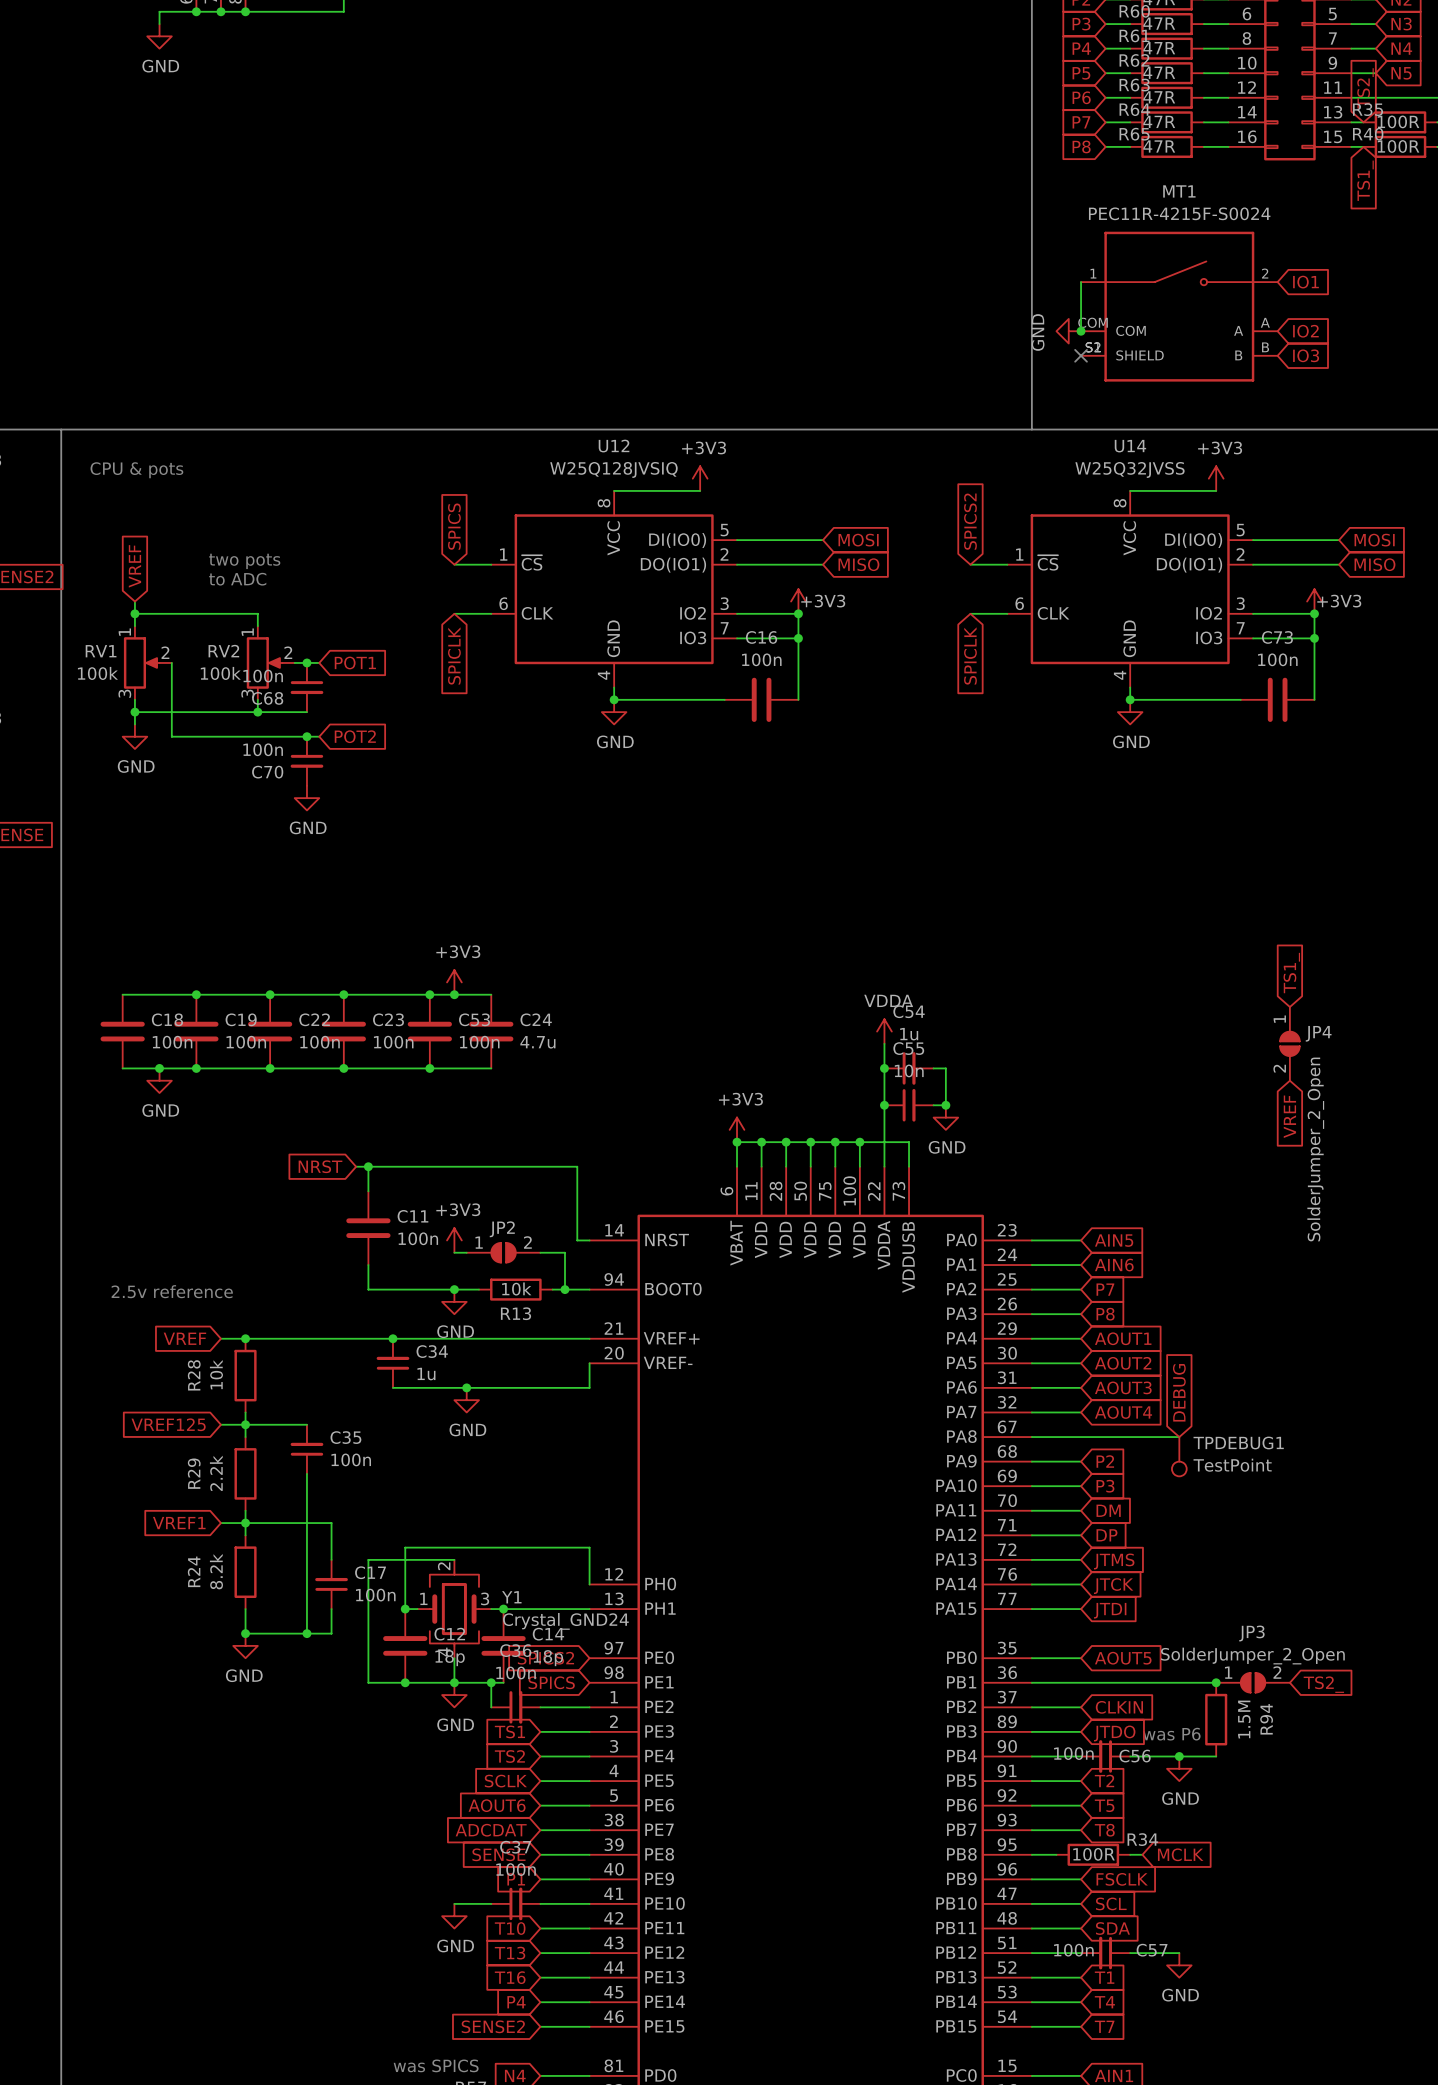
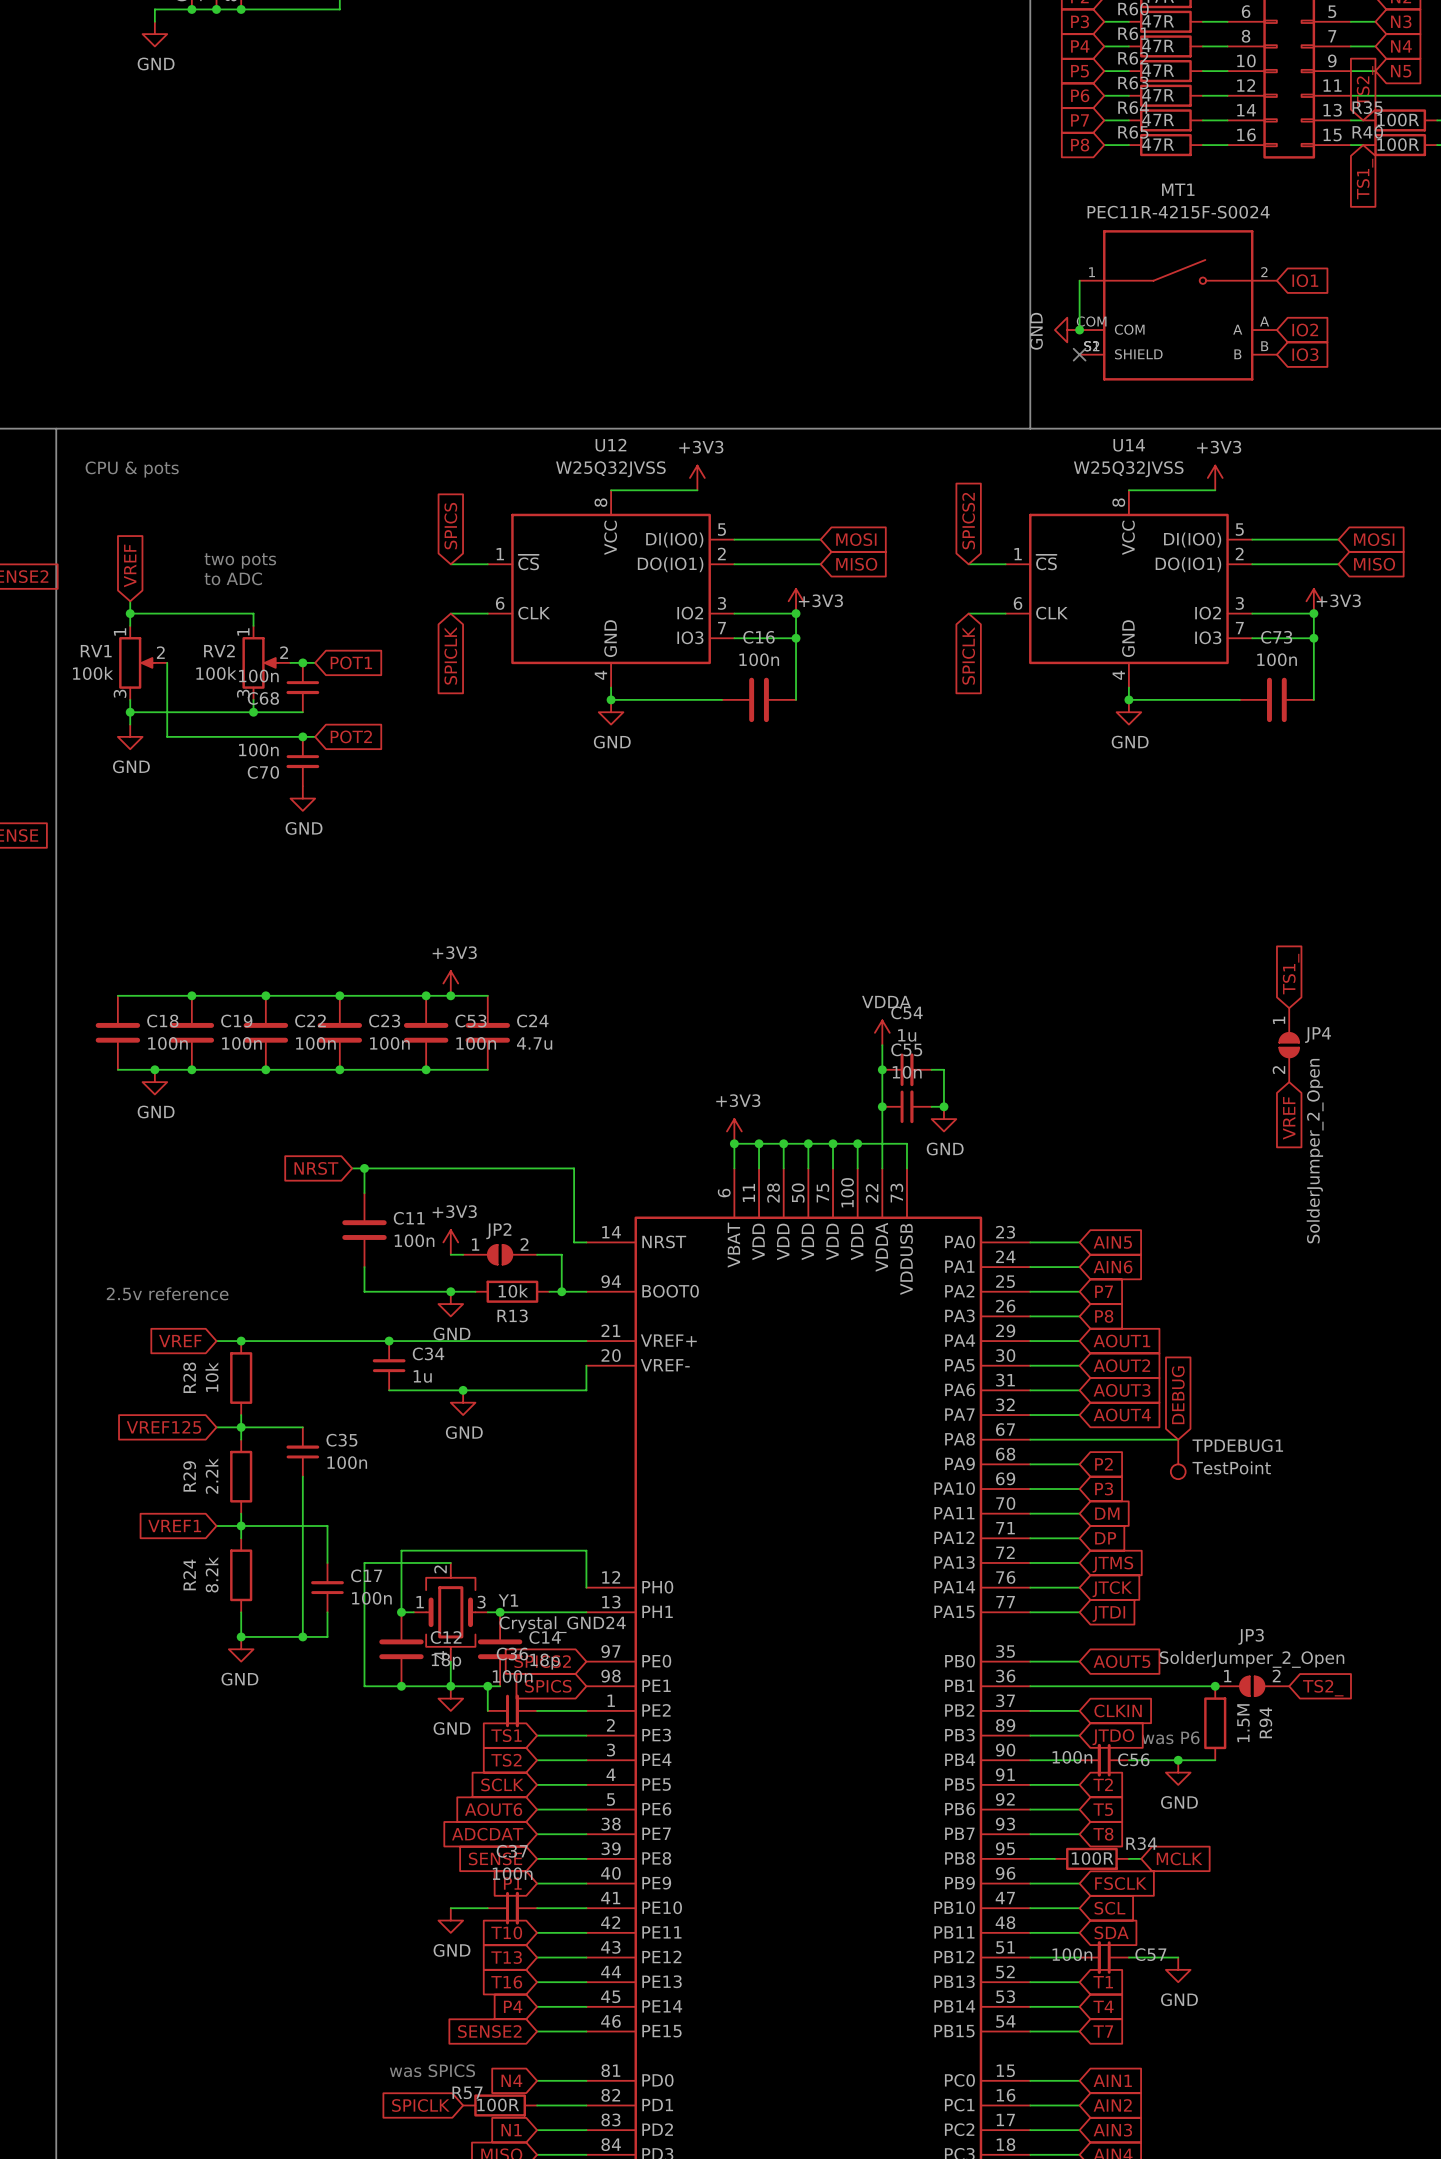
U12 value: W25Q128JVSIQ (613, 469) -> W25Q32JVSS (610, 469)

